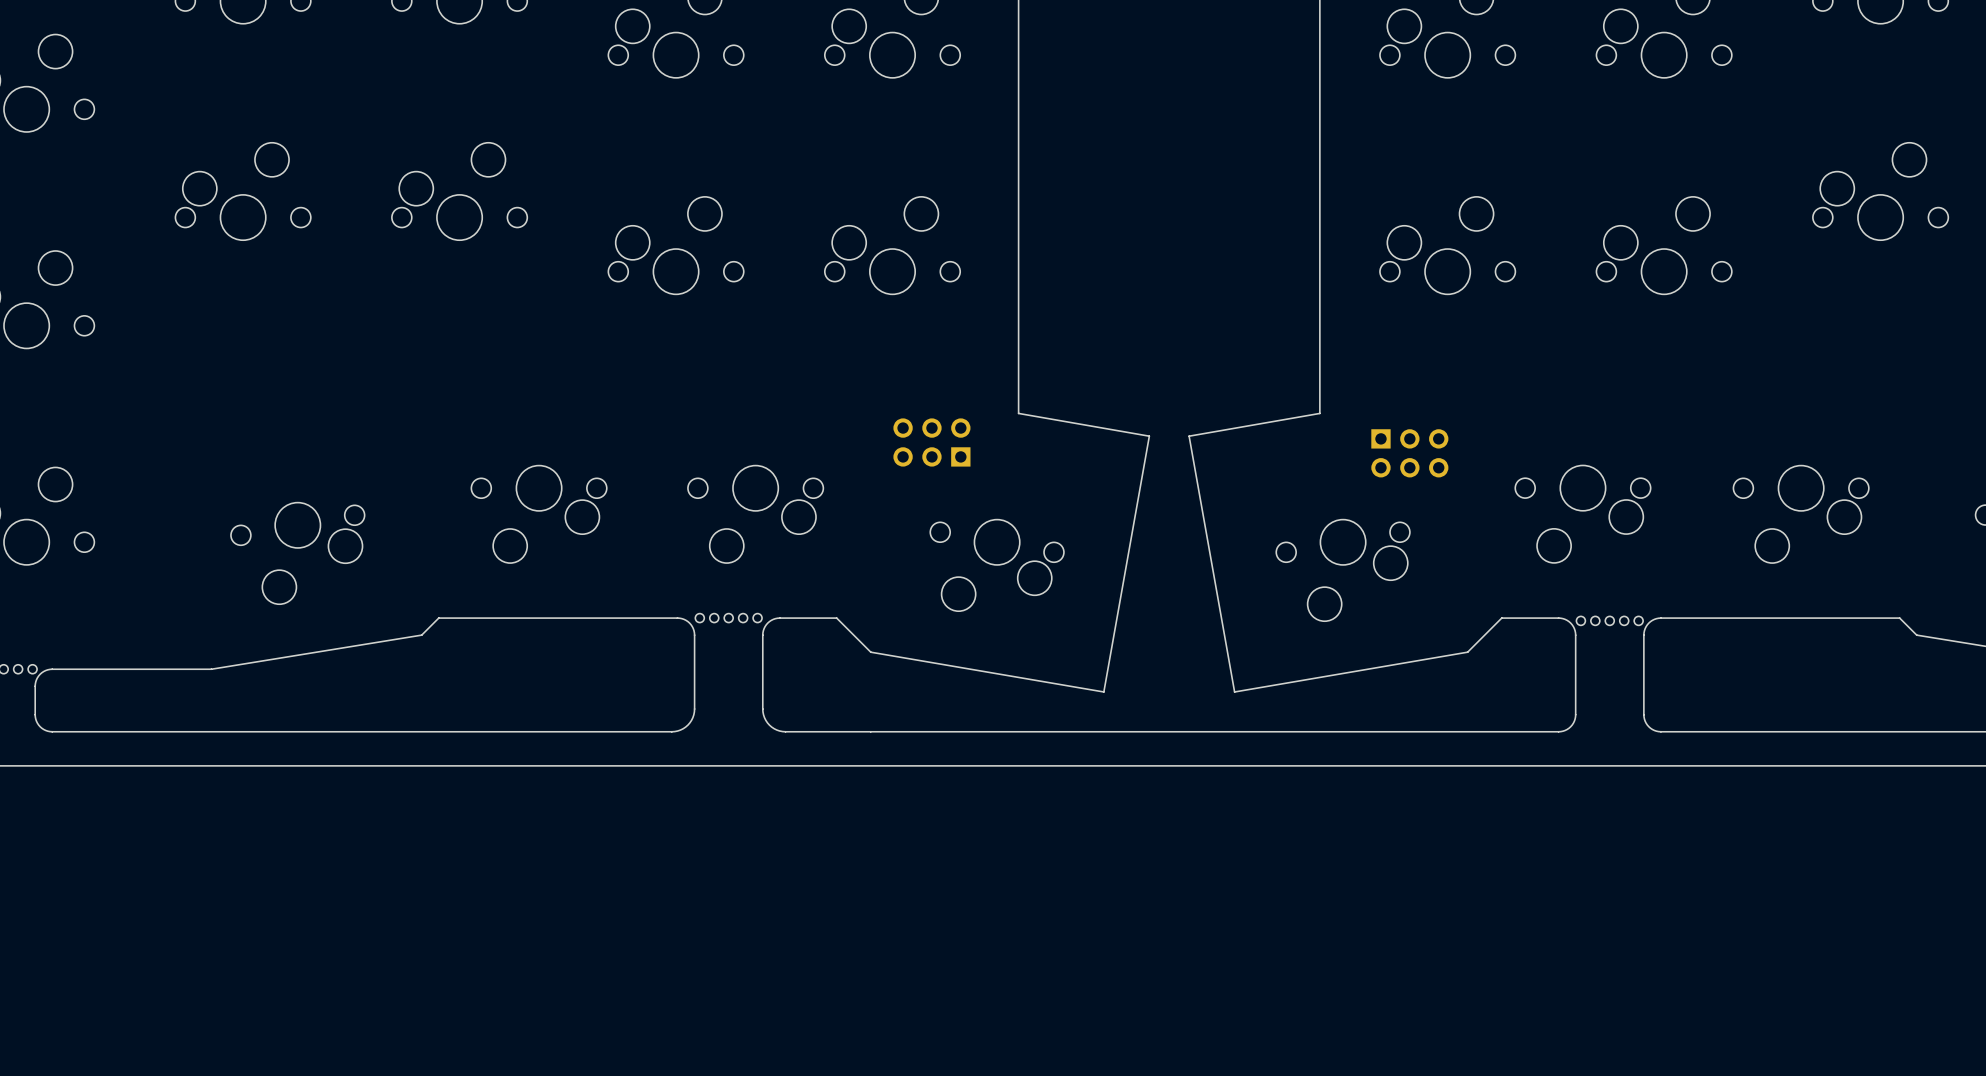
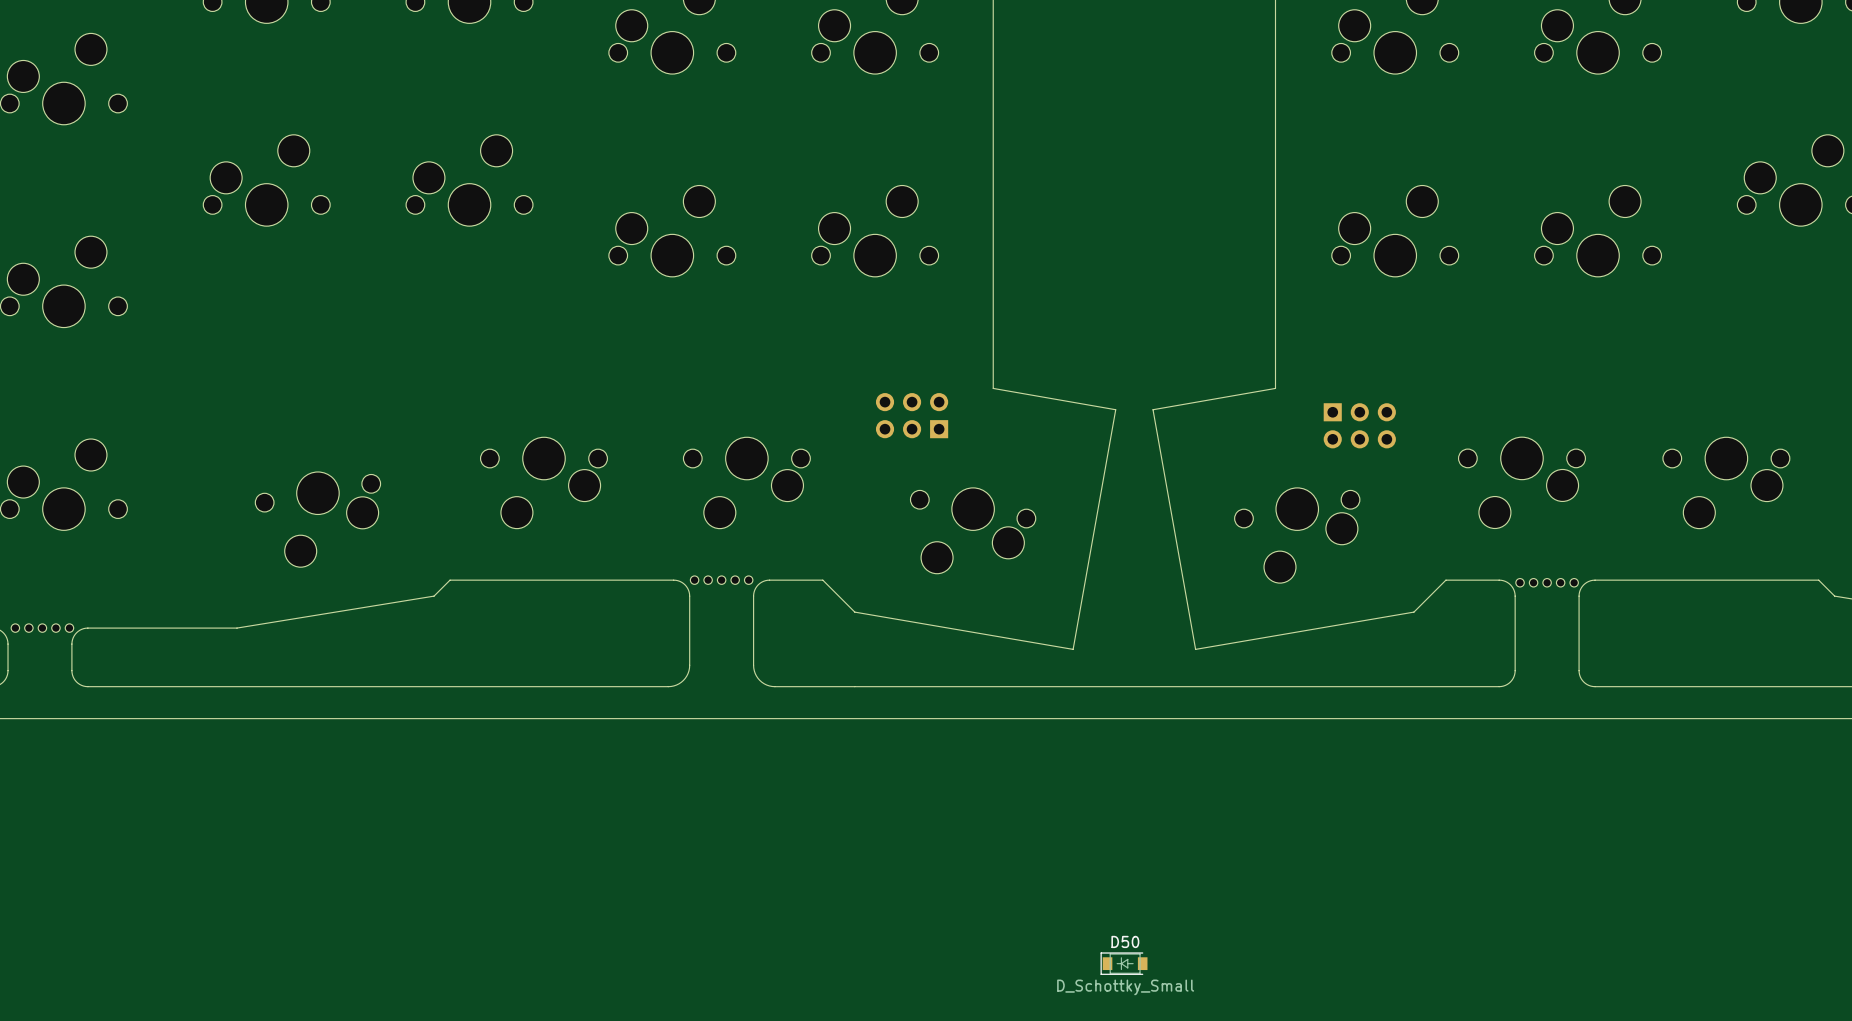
D50: none -> D_Schottky_Small (1124, 963)

